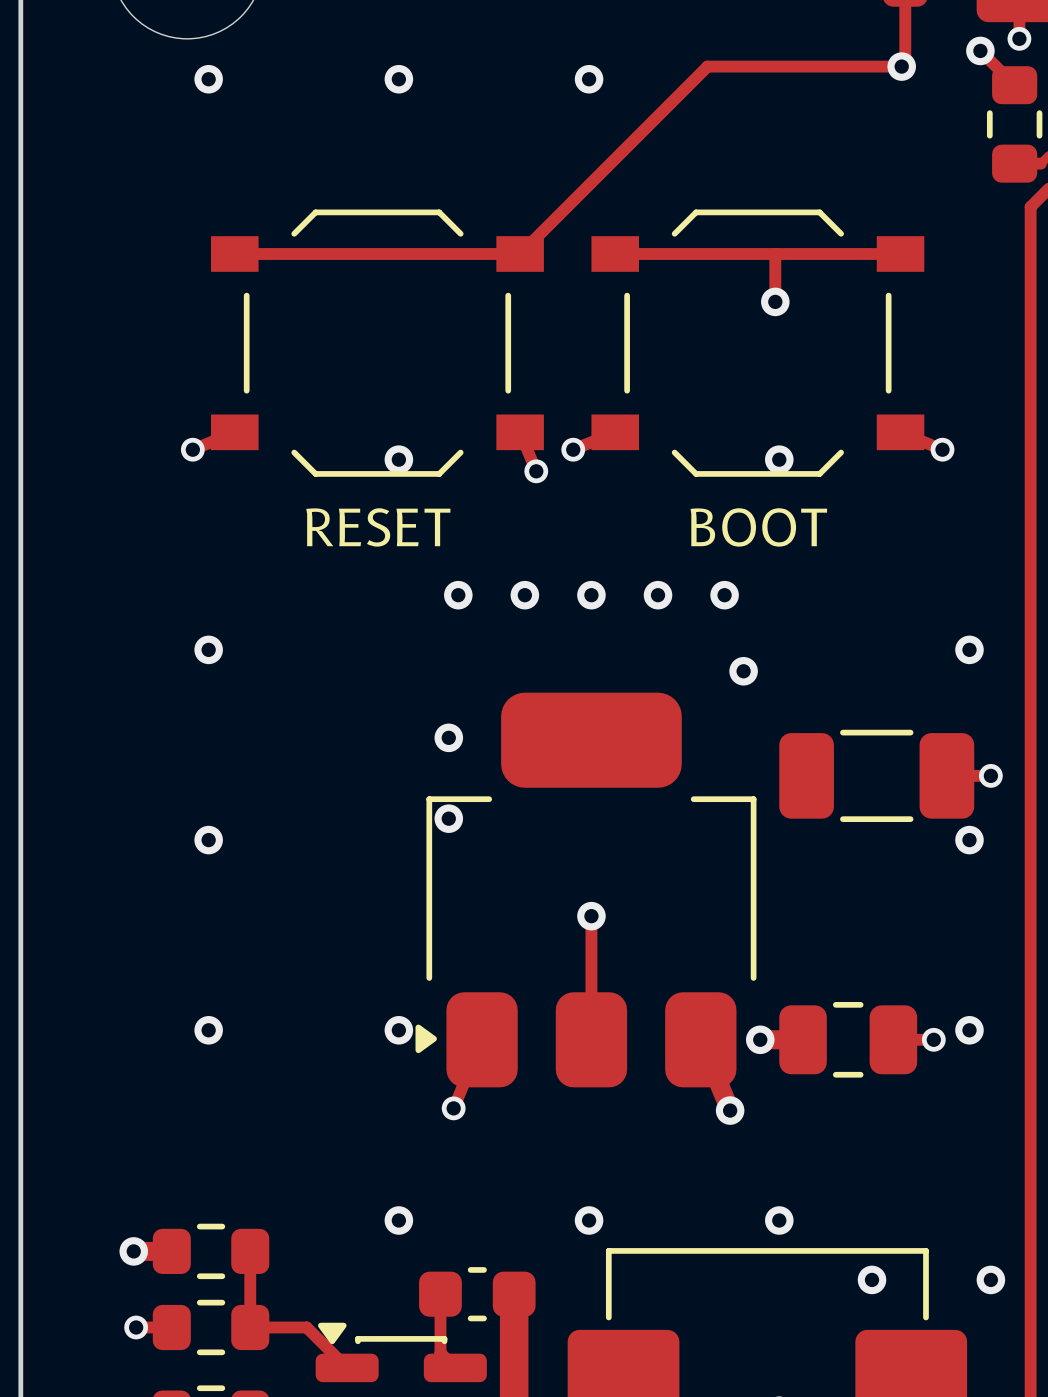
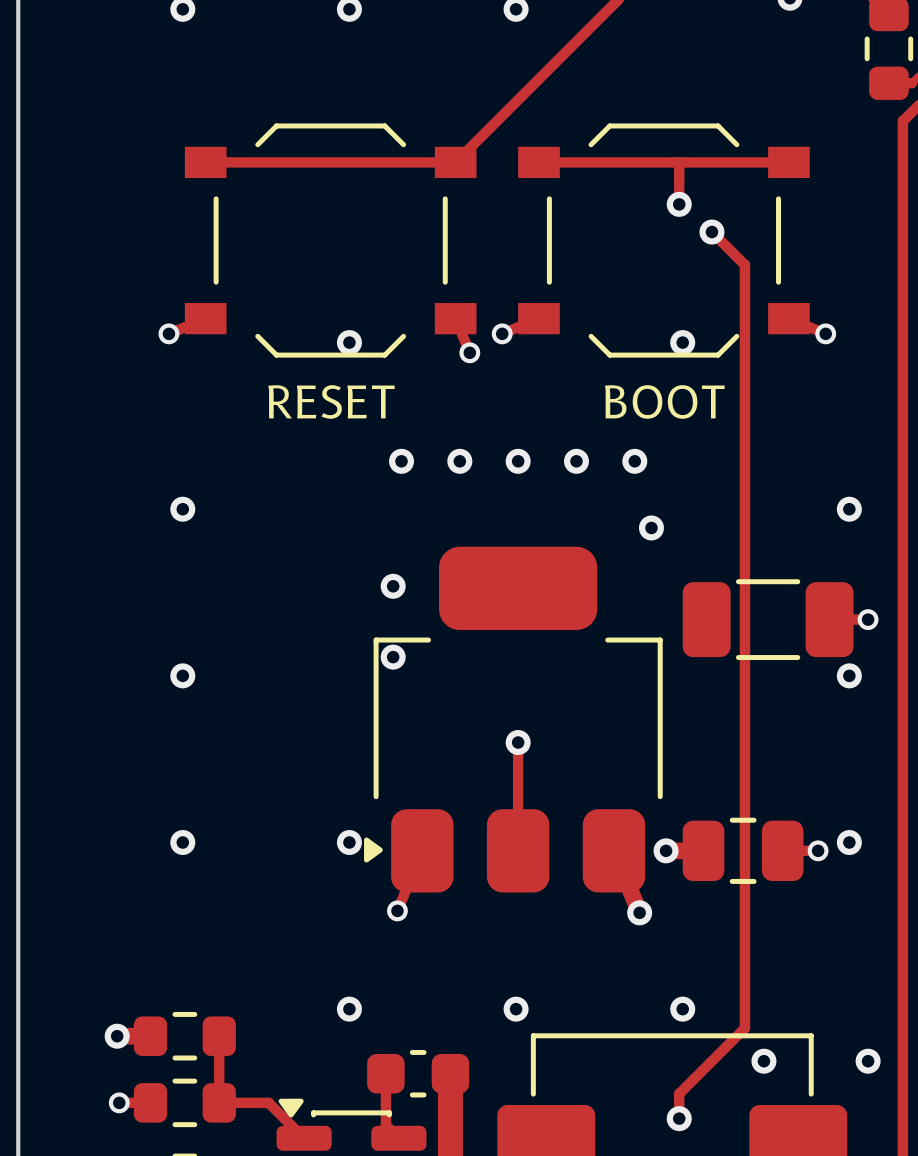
track: none -> (711, 232) (744, 265) (744, 1028) (679, 1093) (679, 1118)
via: none -> (711, 232)
via: none -> (679, 1118)

